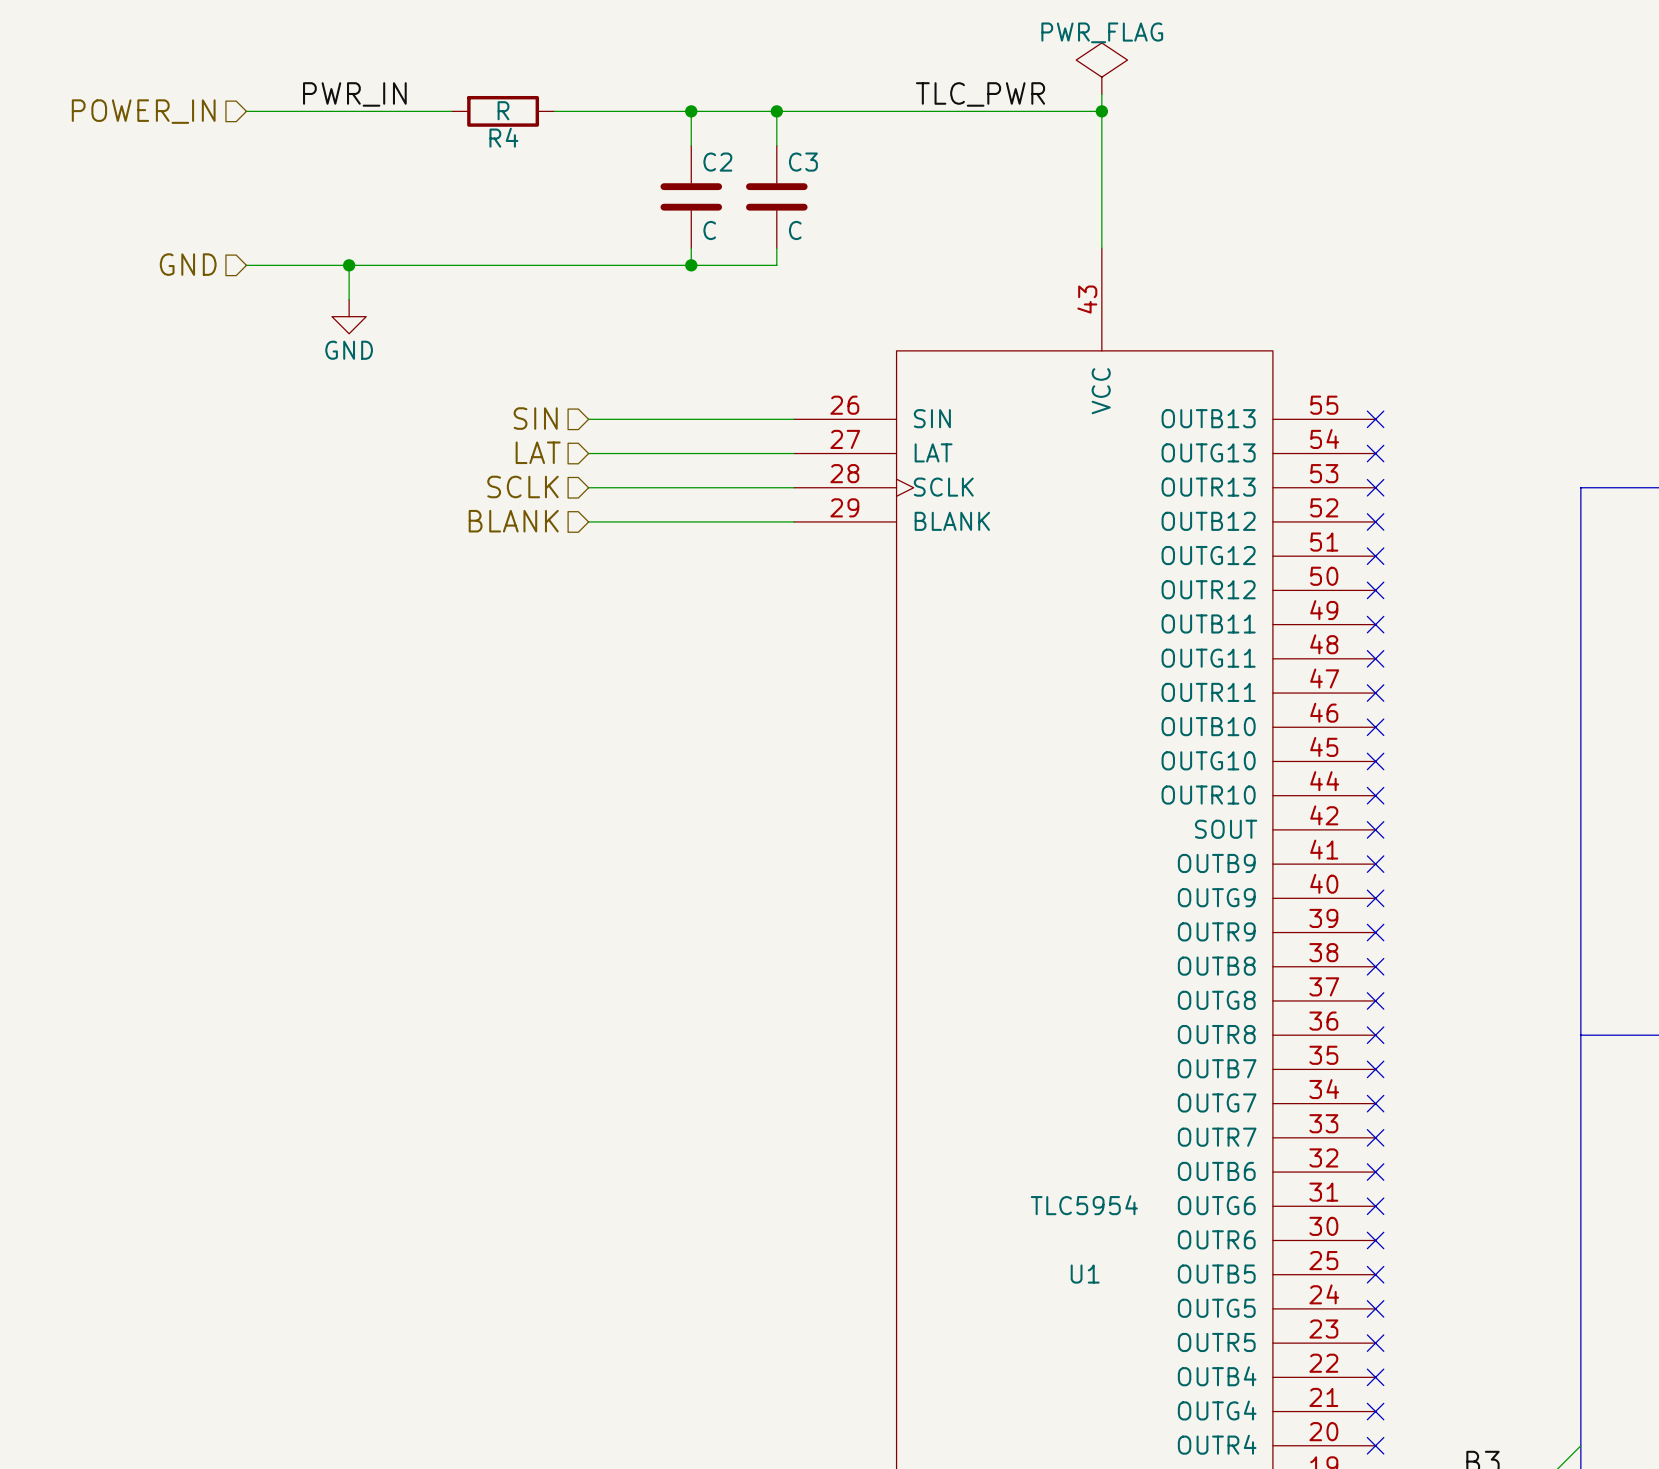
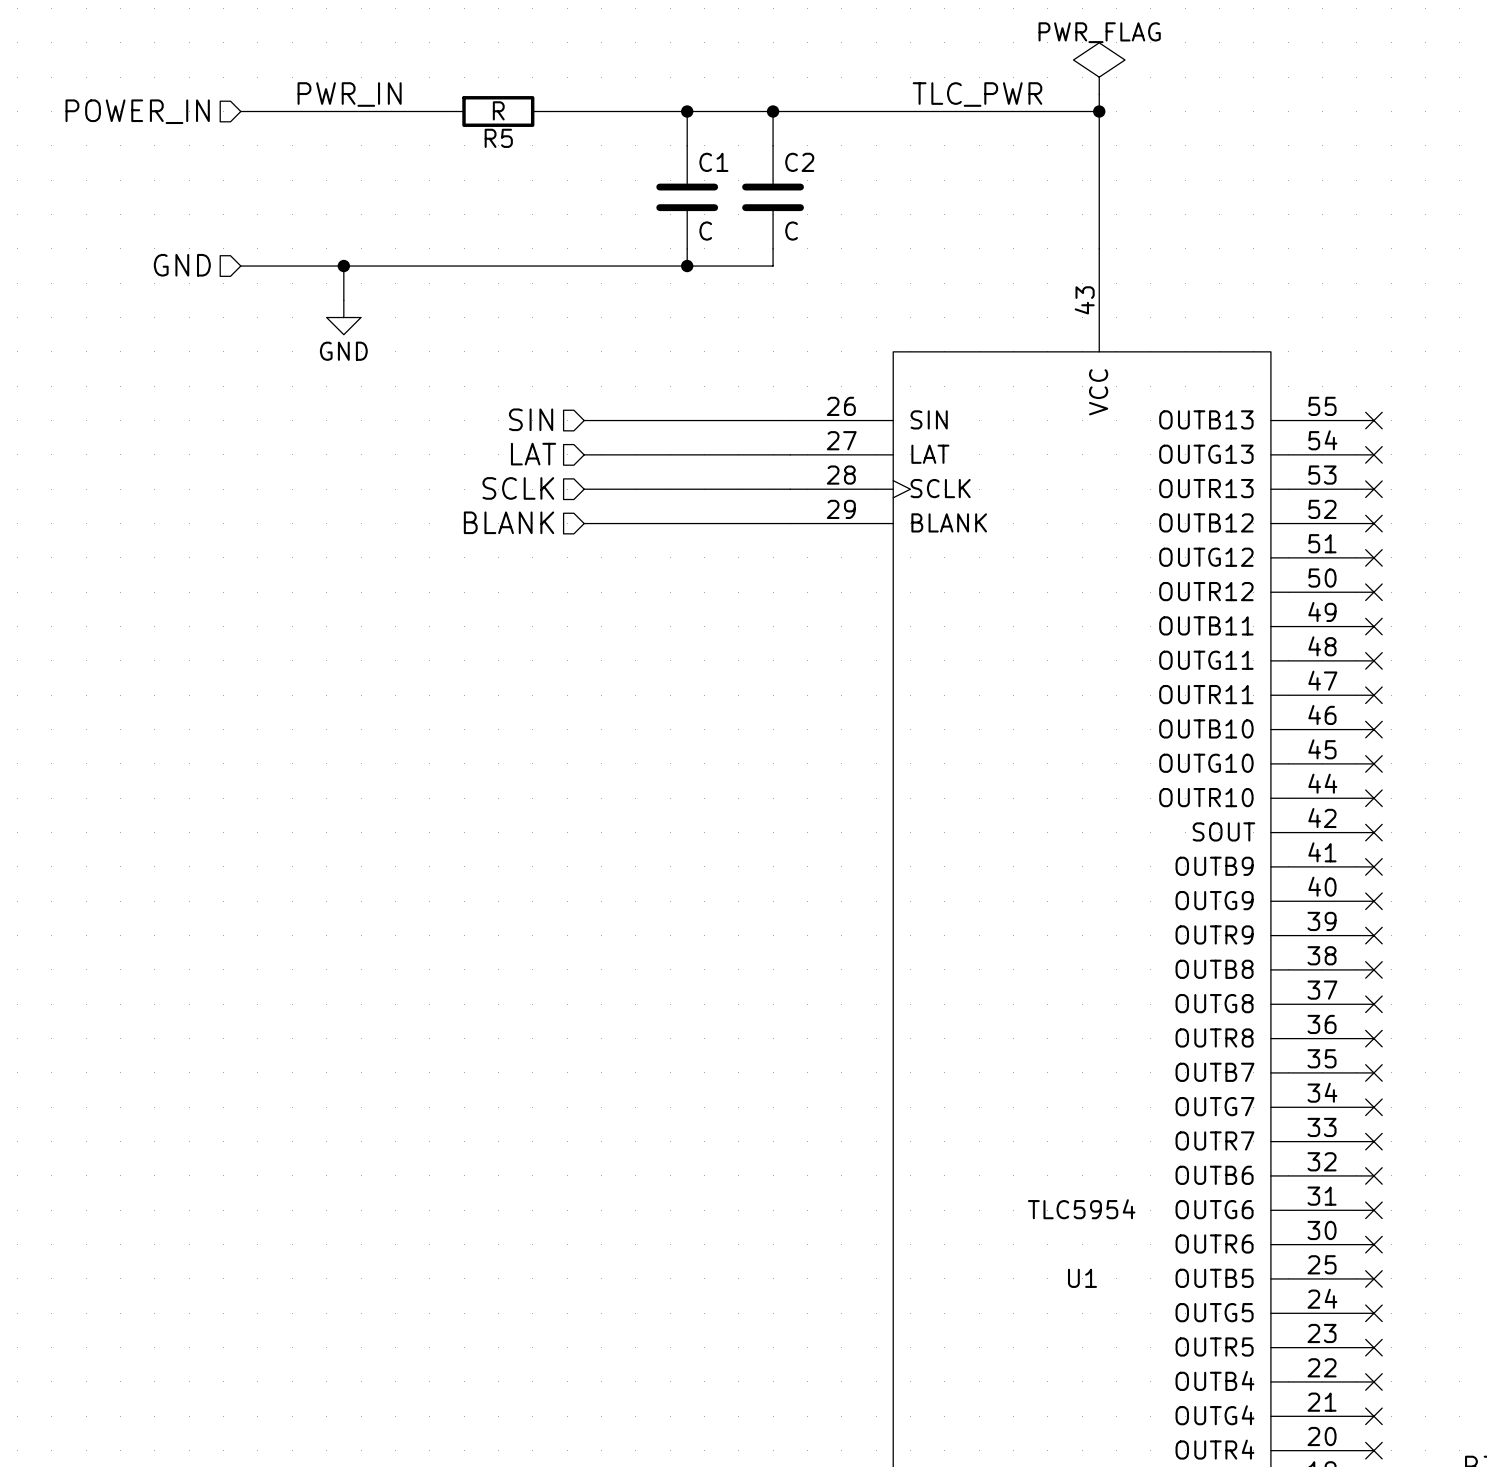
R4 name: R4 (503, 137) -> R5 (498, 138)
C2 name: C2 (717, 162) -> C1 (713, 162)
C3 name: C3 (803, 162) -> C2 (799, 162)

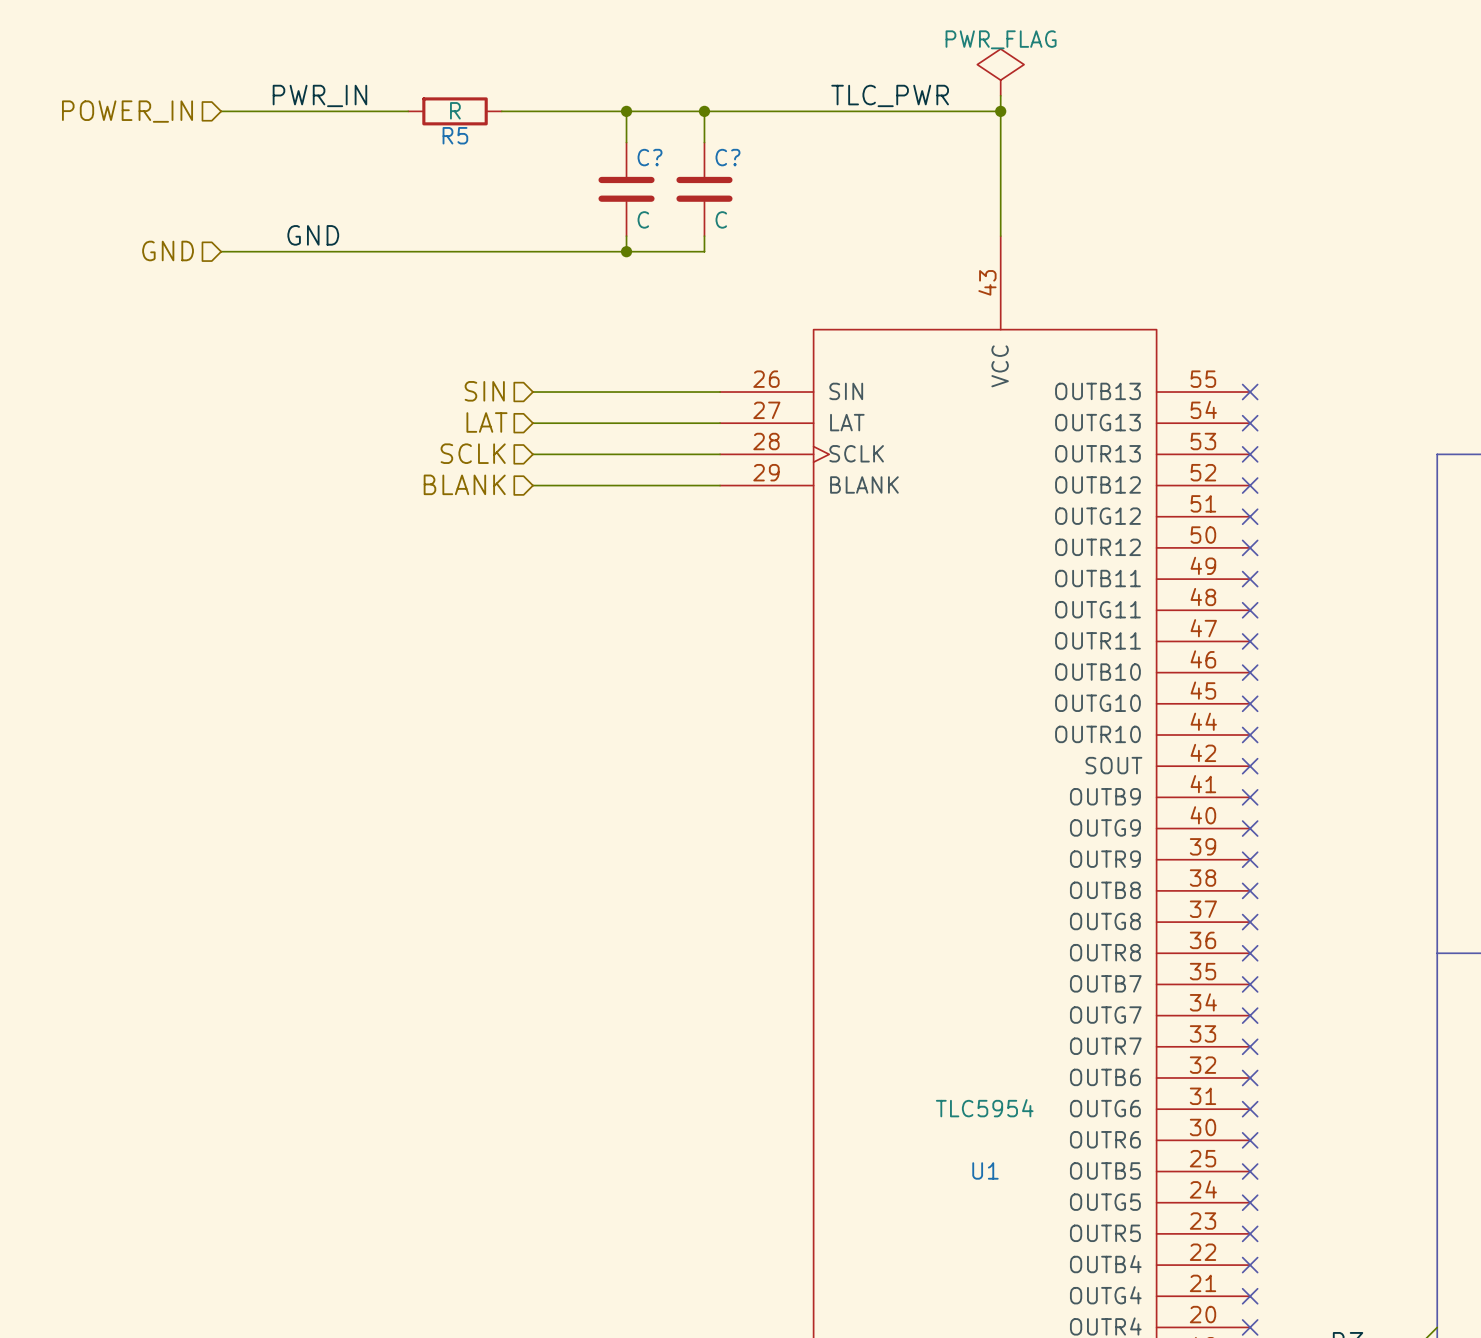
C1 name: C1 (713, 162) -> C? (650, 157)
C2 name: C2 (799, 162) -> C? (727, 157)
label: none -> GND (313, 235)
wire: (343, 266) (343, 300) -> none
junction: (343, 266) -> none
power symbol: GND (343, 317) -> none

